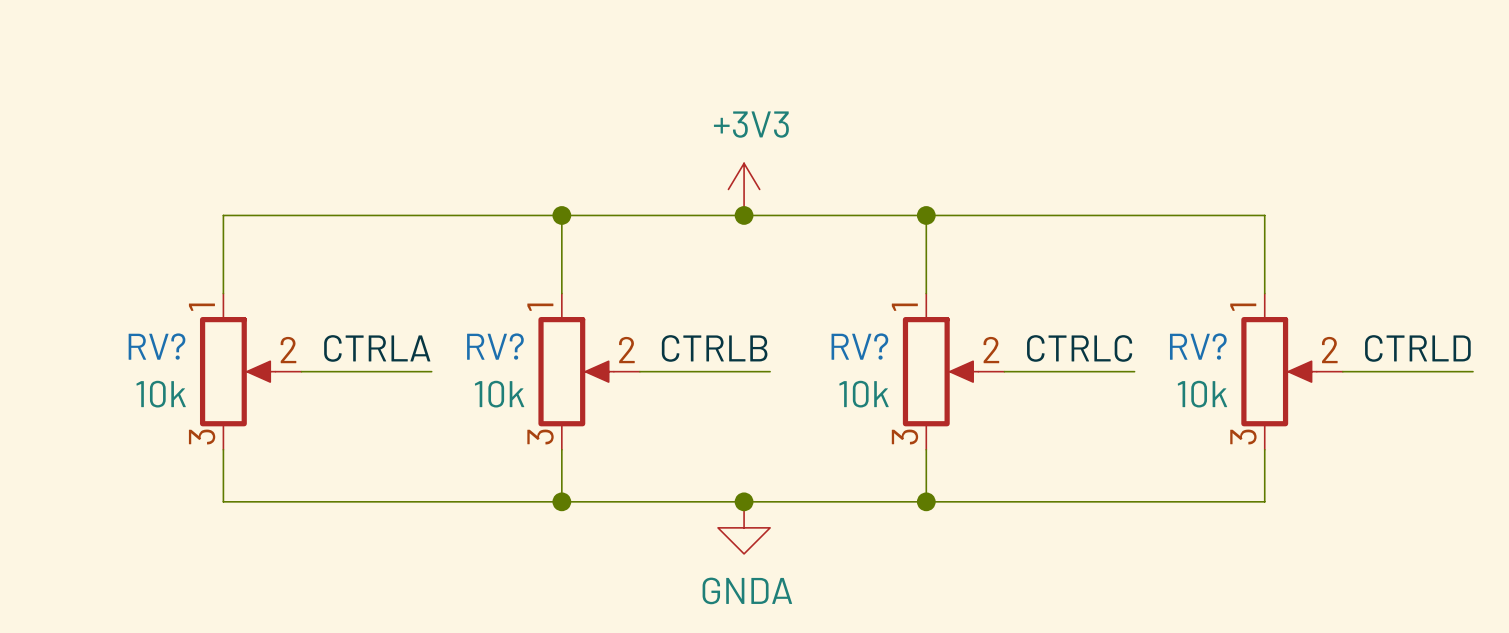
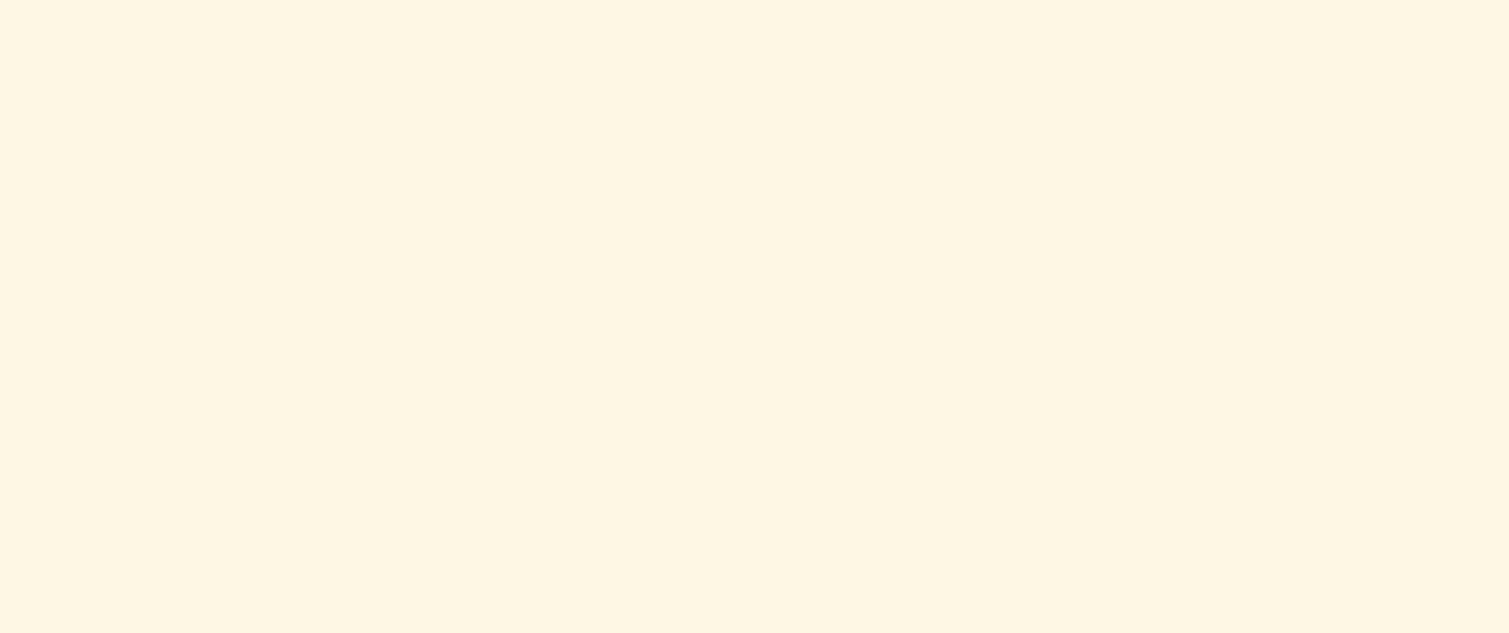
power symbol: +3V3 (744, 189) -> none
wire: (561, 215) (561, 293) -> none
junction: (561, 215) -> none
junction: (744, 215) -> none
wire: (926, 215) (926, 293) -> none
junction: (926, 215) -> none
wire: (223, 293) (223, 215) (1264, 215) (1264, 293) -> none
label: CTRLA (377, 348) -> none
label: CTRLB (714, 348) -> none
label: CTRLC (1079, 348) -> none
label: CTRLD (1417, 348) -> none
RV?: 10k (250, 371) -> none
wire: (301, 371) (431, 371) -> none
RV?: 10k (589, 371) -> none
wire: (639, 371) (770, 371) -> none
RV?: 10k (953, 371) -> none
wire: (1004, 371) (1134, 371) -> none
RV?: 10k (1292, 371) -> none
wire: (1342, 371) (1472, 371) -> none
wire: (223, 449) (223, 501) (1264, 501) (1264, 449) -> none
wire: (561, 449) (561, 501) -> none
wire: (926, 449) (926, 501) -> none
junction: (561, 501) -> none
junction: (744, 501) -> none
junction: (926, 501) -> none
power symbol: GNDA (744, 527) -> none

